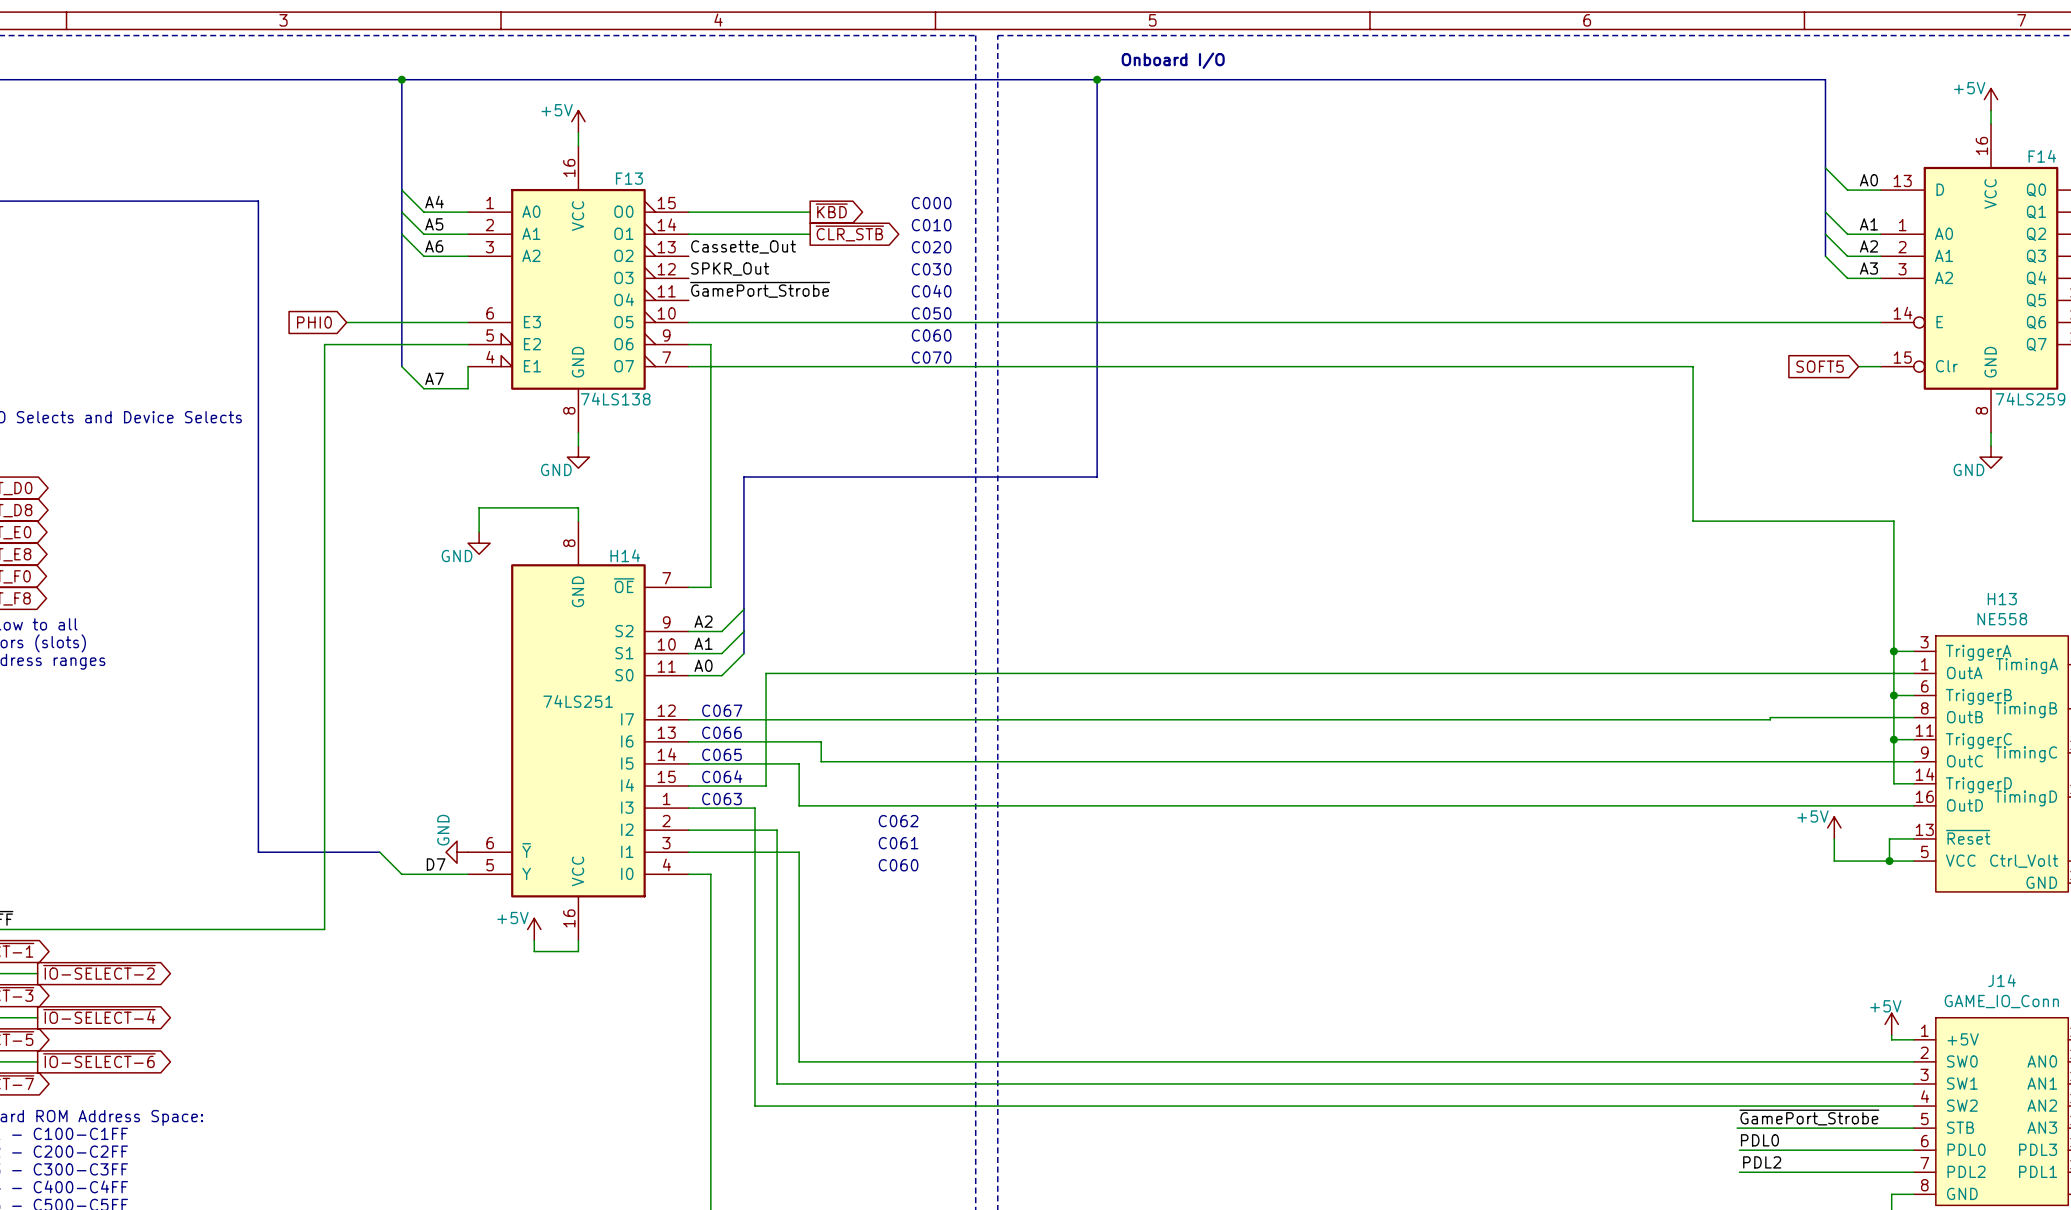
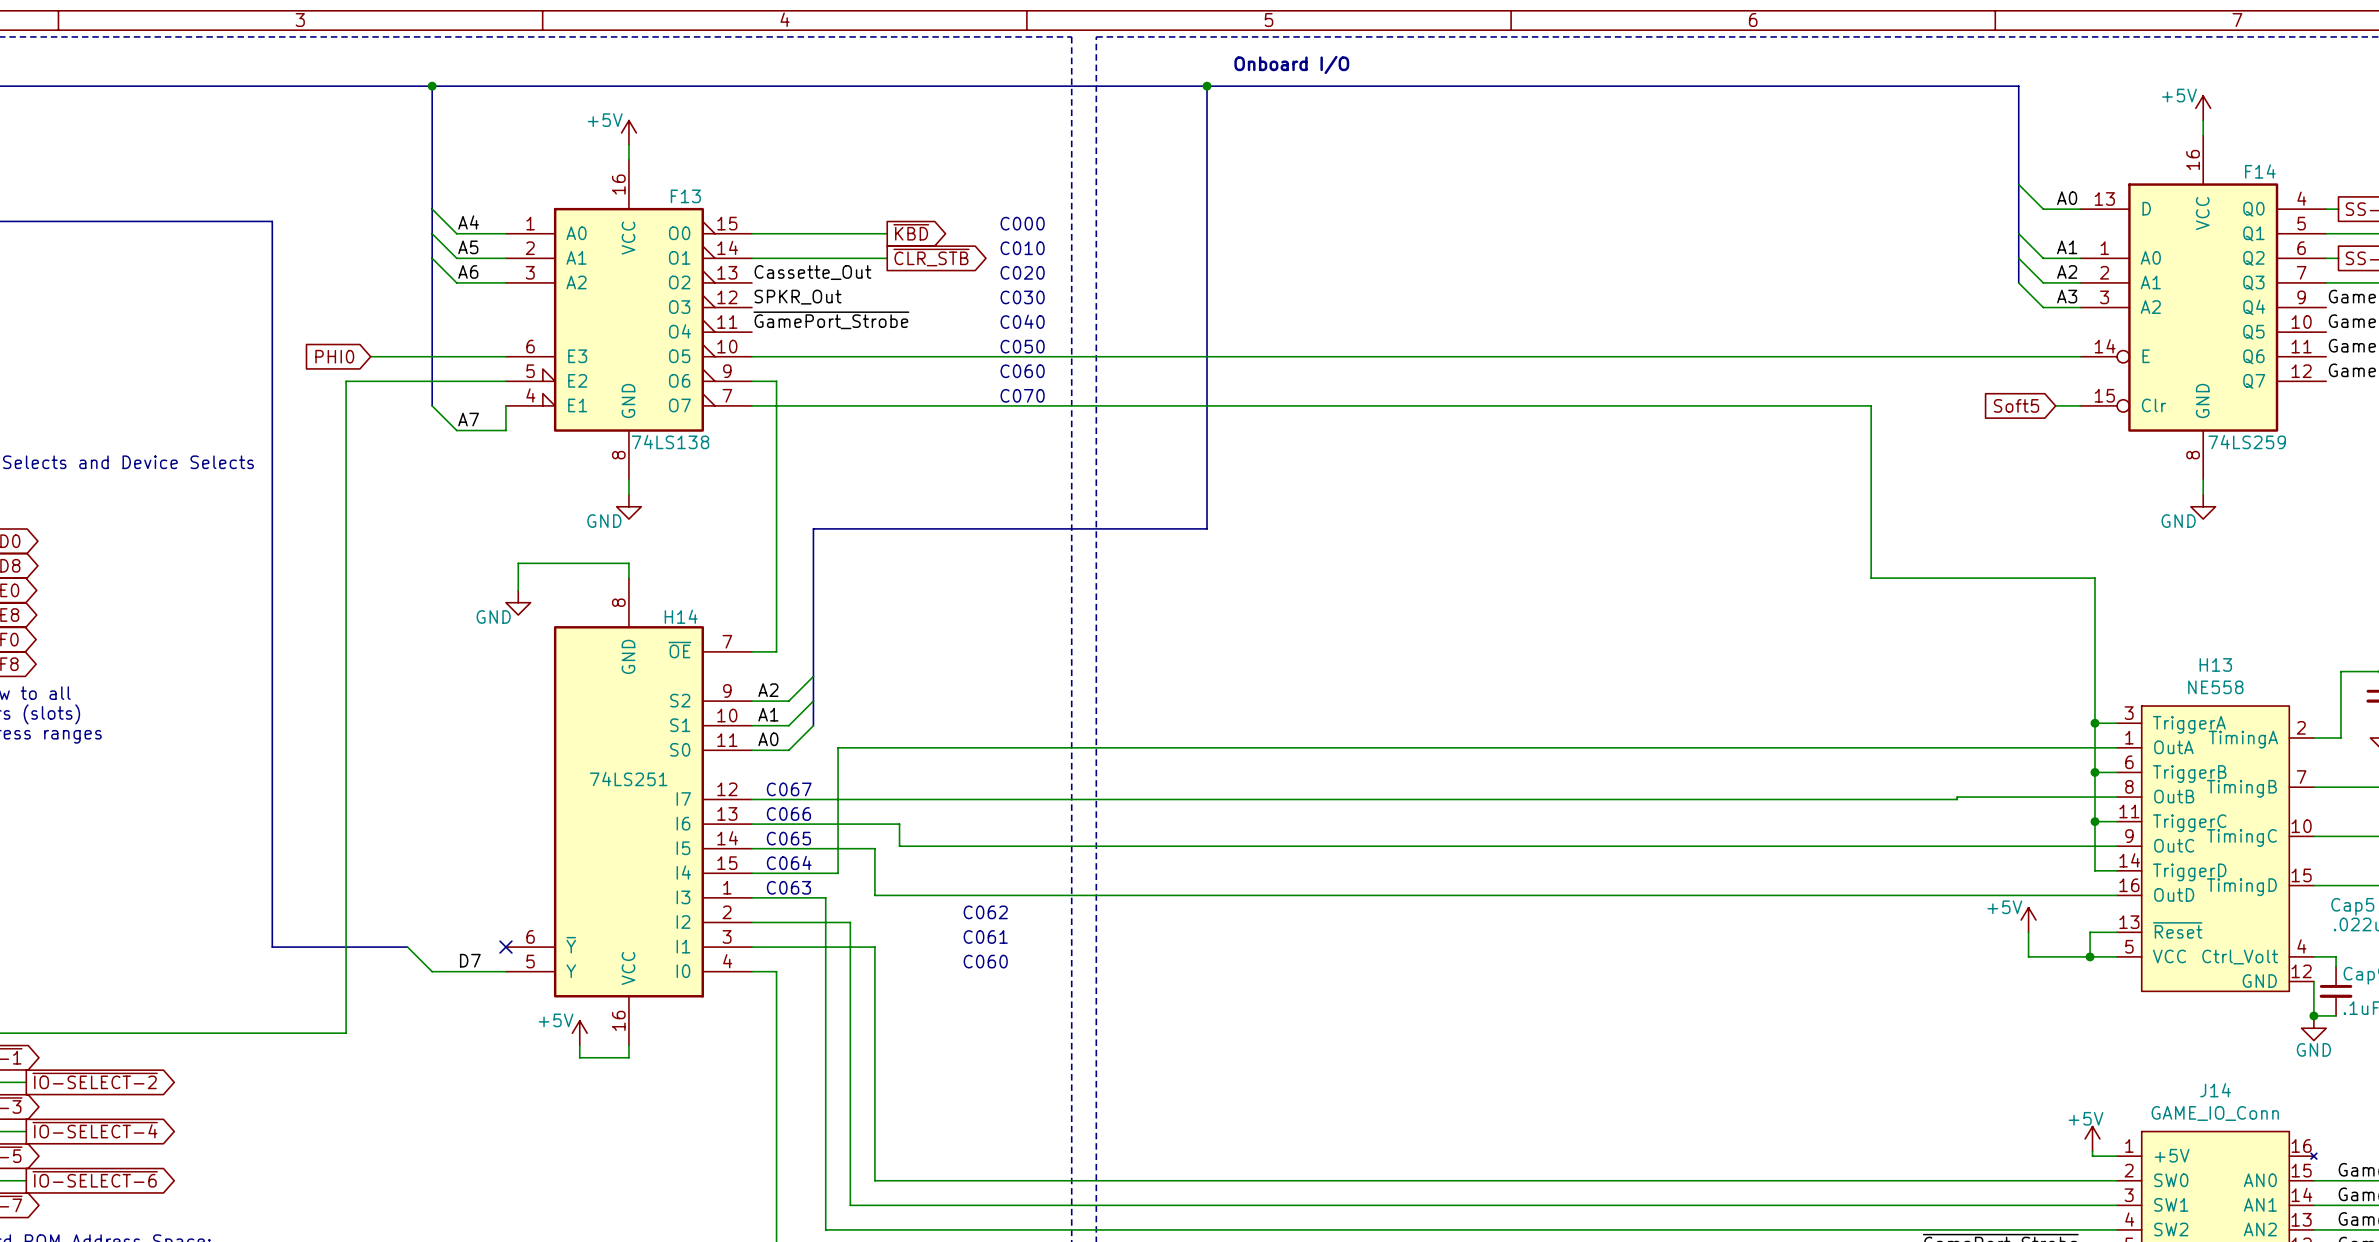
global label: SOFT5 (1820, 366) -> Soft5 (2016, 405)
power symbol: GND (457, 852) -> none
no-connect mark: none -> (505, 947)

